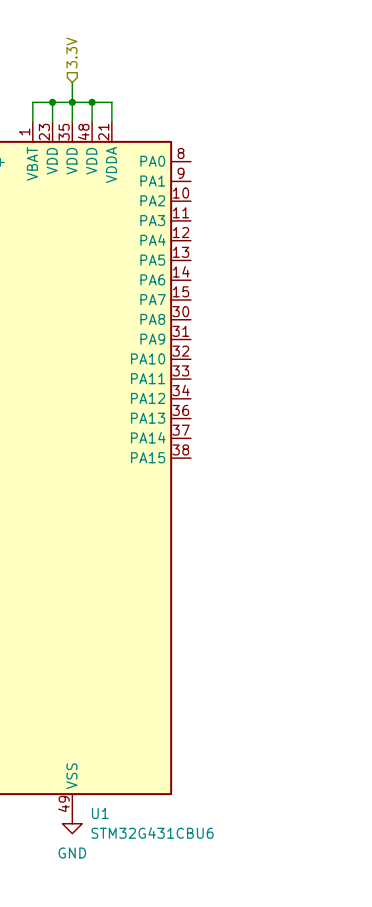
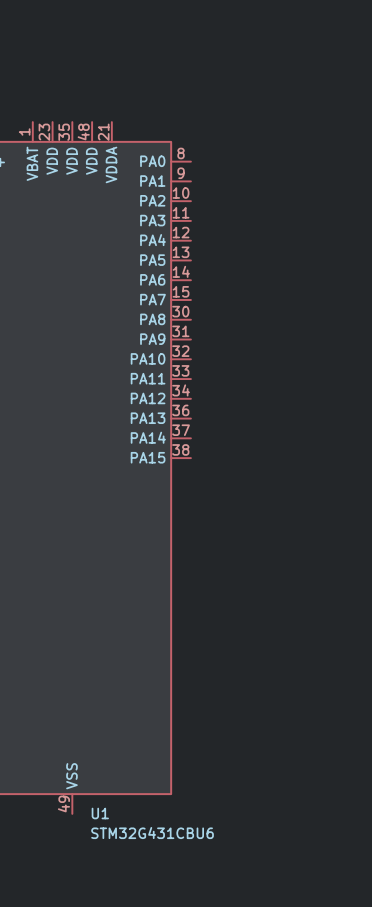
hierarchical label: 3.3V (71, 53) -> none
wire: (72, 82) (72, 122) -> none
wire: (52, 102) (52, 122) -> none
junction: (52, 102) -> none
junction: (72, 102) -> none
wire: (92, 102) (92, 122) -> none
junction: (92, 102) -> none
wire: (32, 122) (32, 102) (111, 102) (111, 122) -> none
power symbol: GND (72, 823) -> none

